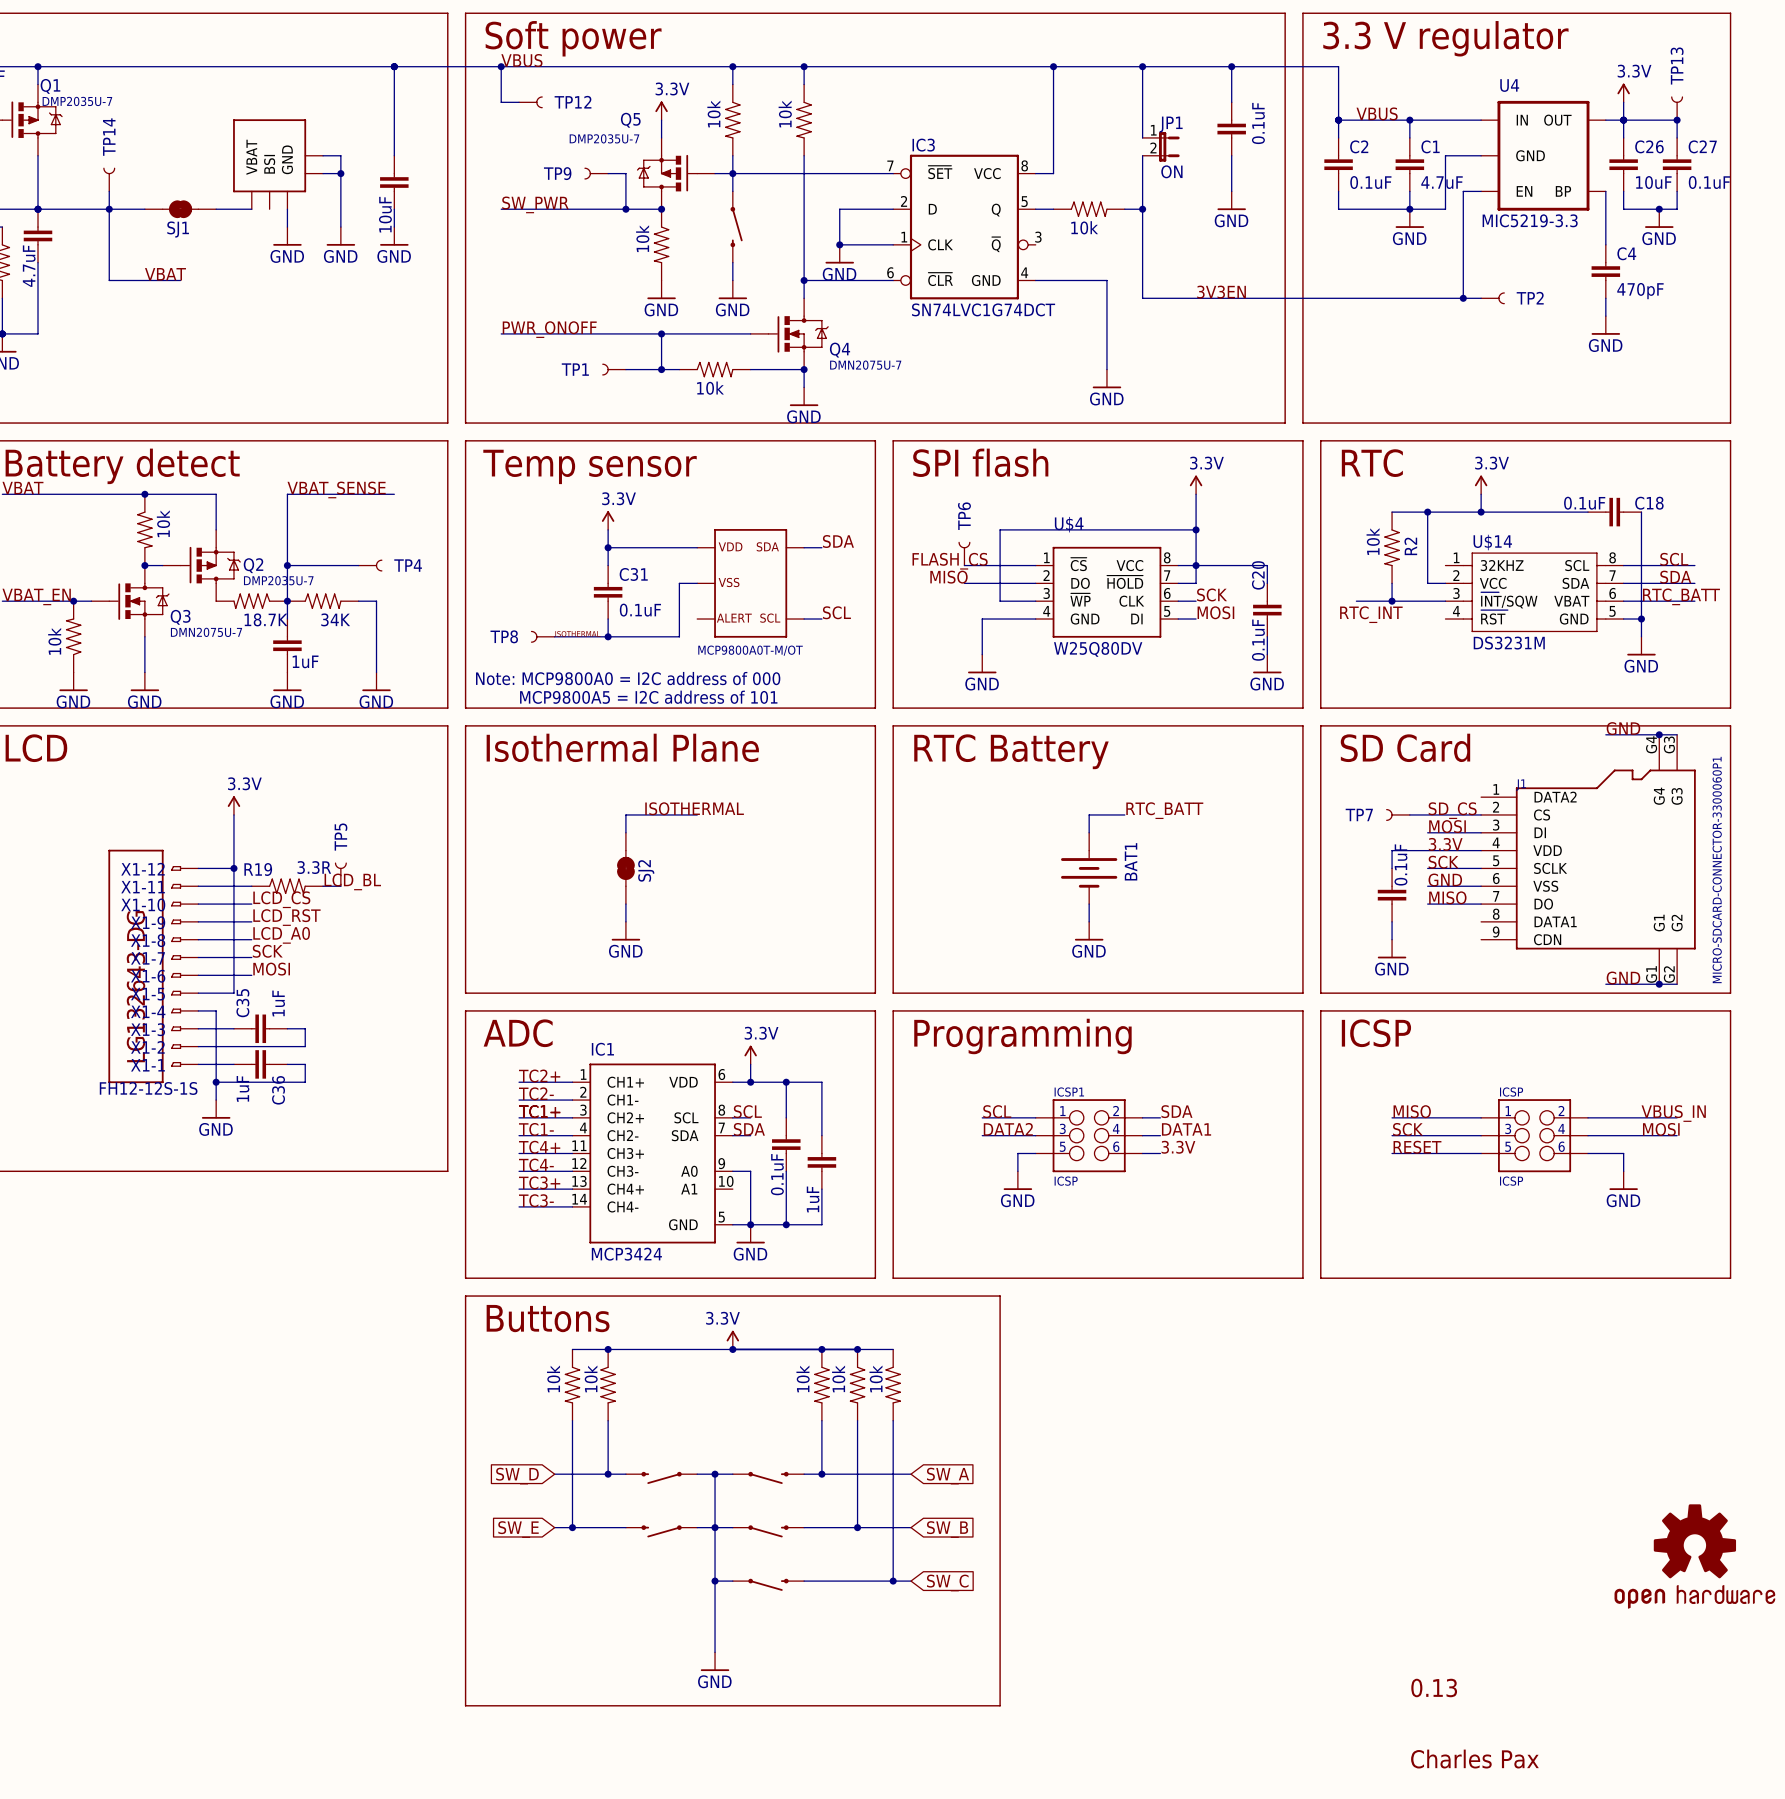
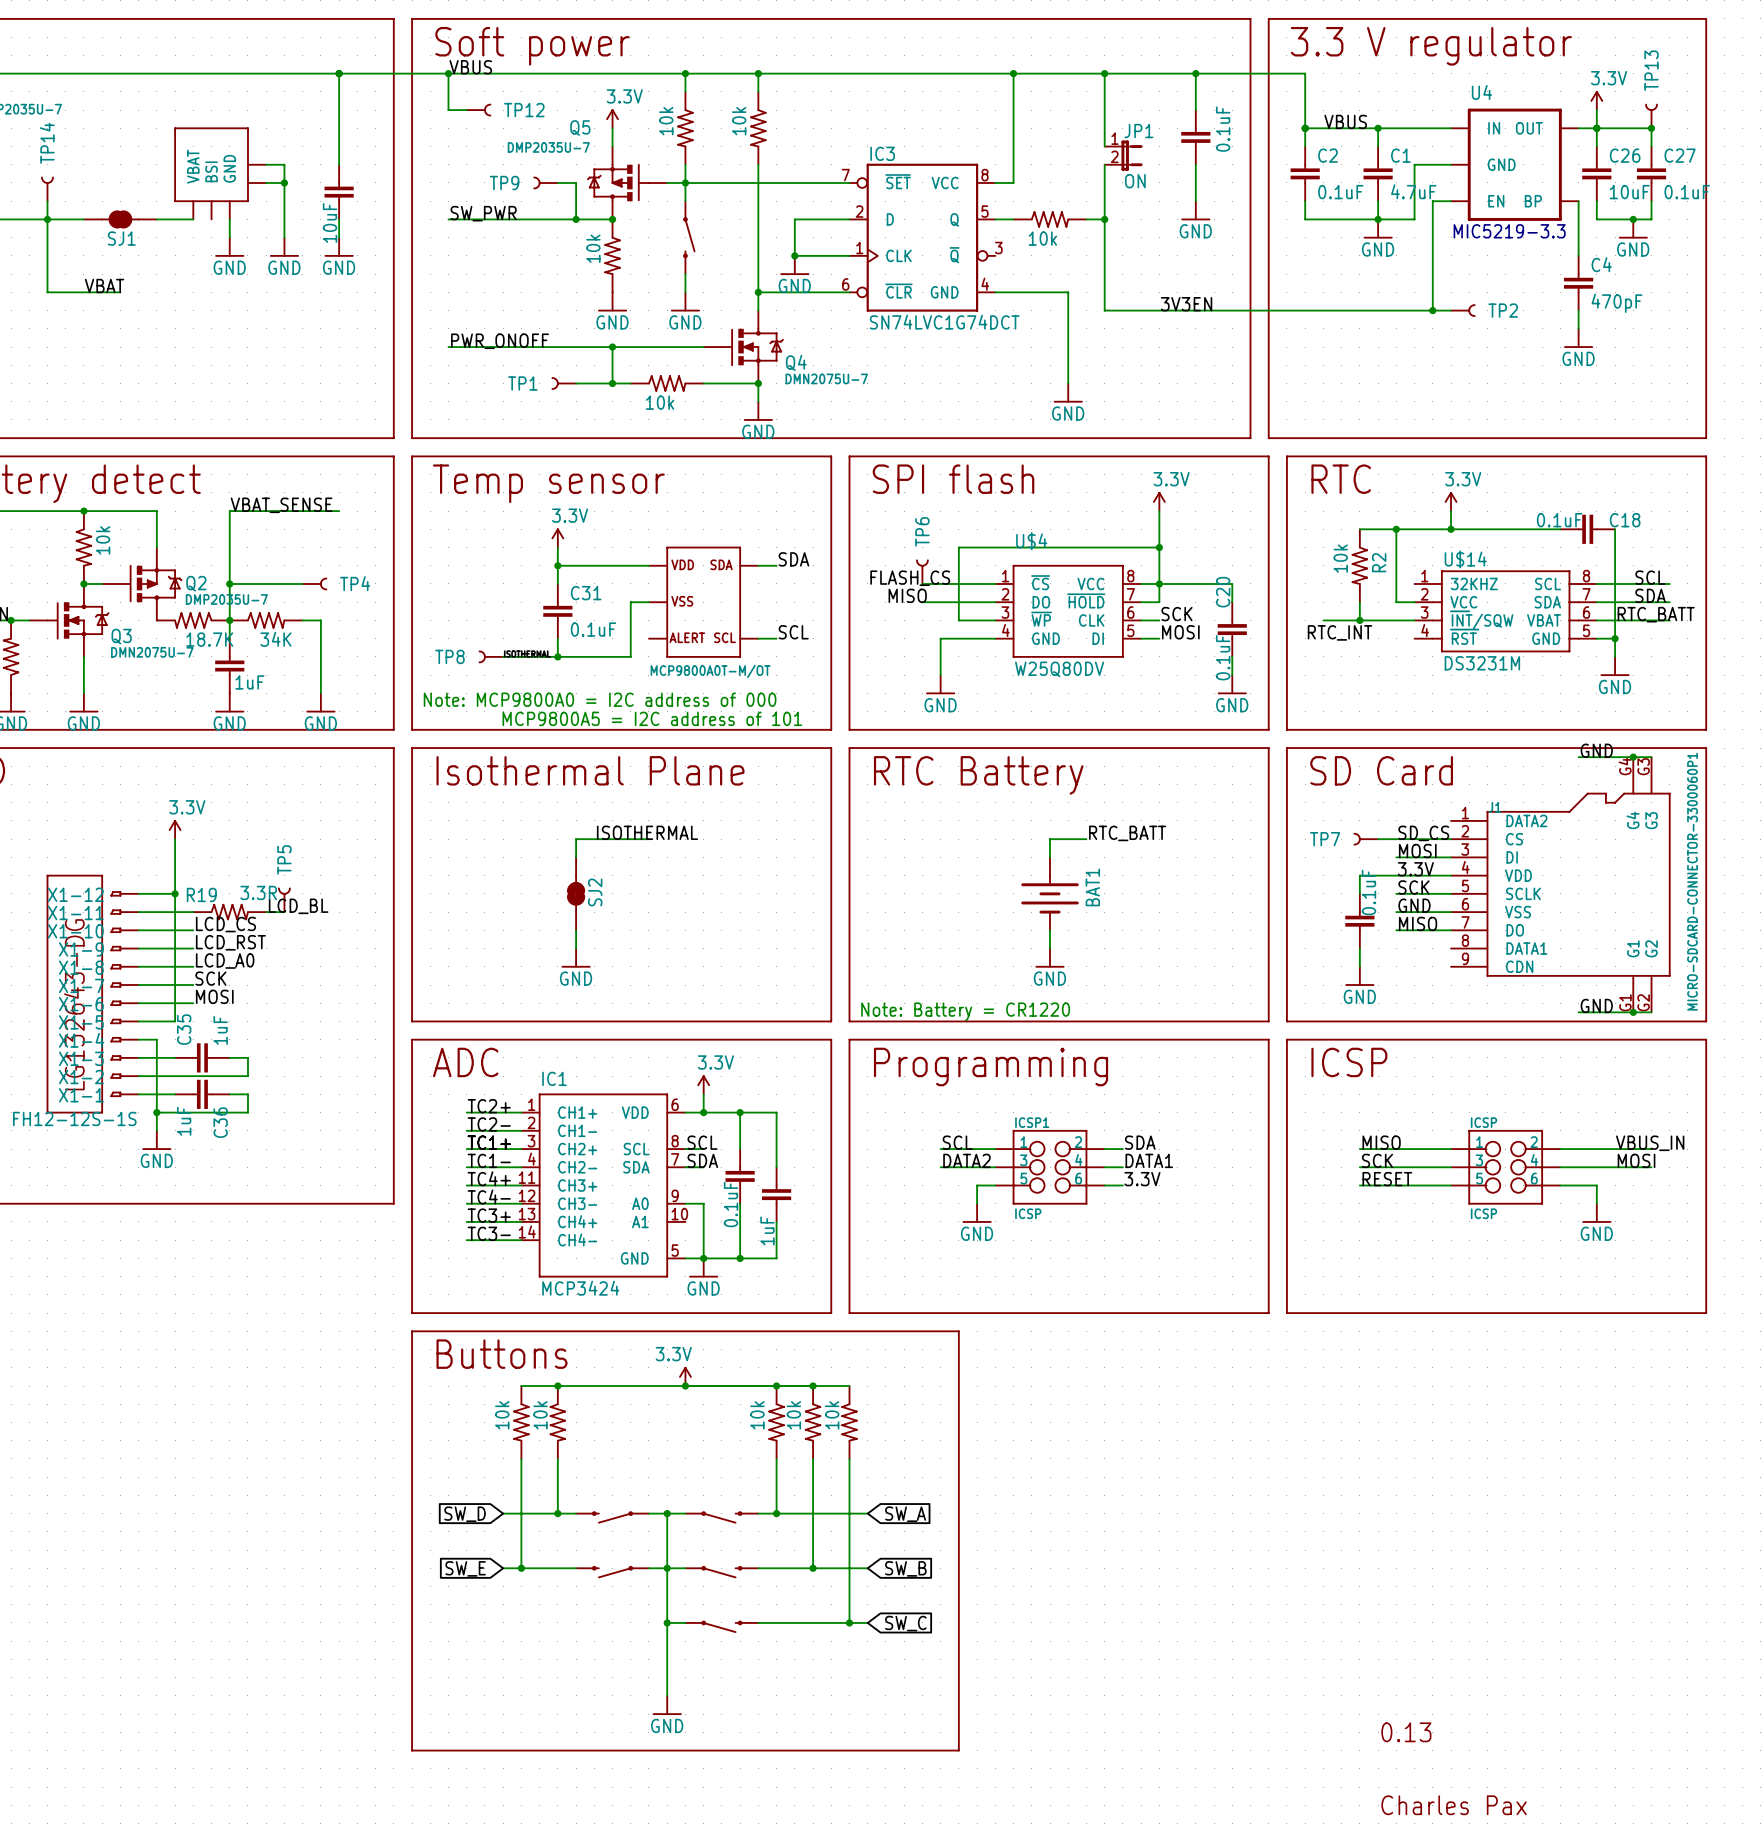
text: none -> Note: Battery = CR1220 (965, 1011)
part: (1694, 1556) -> none

